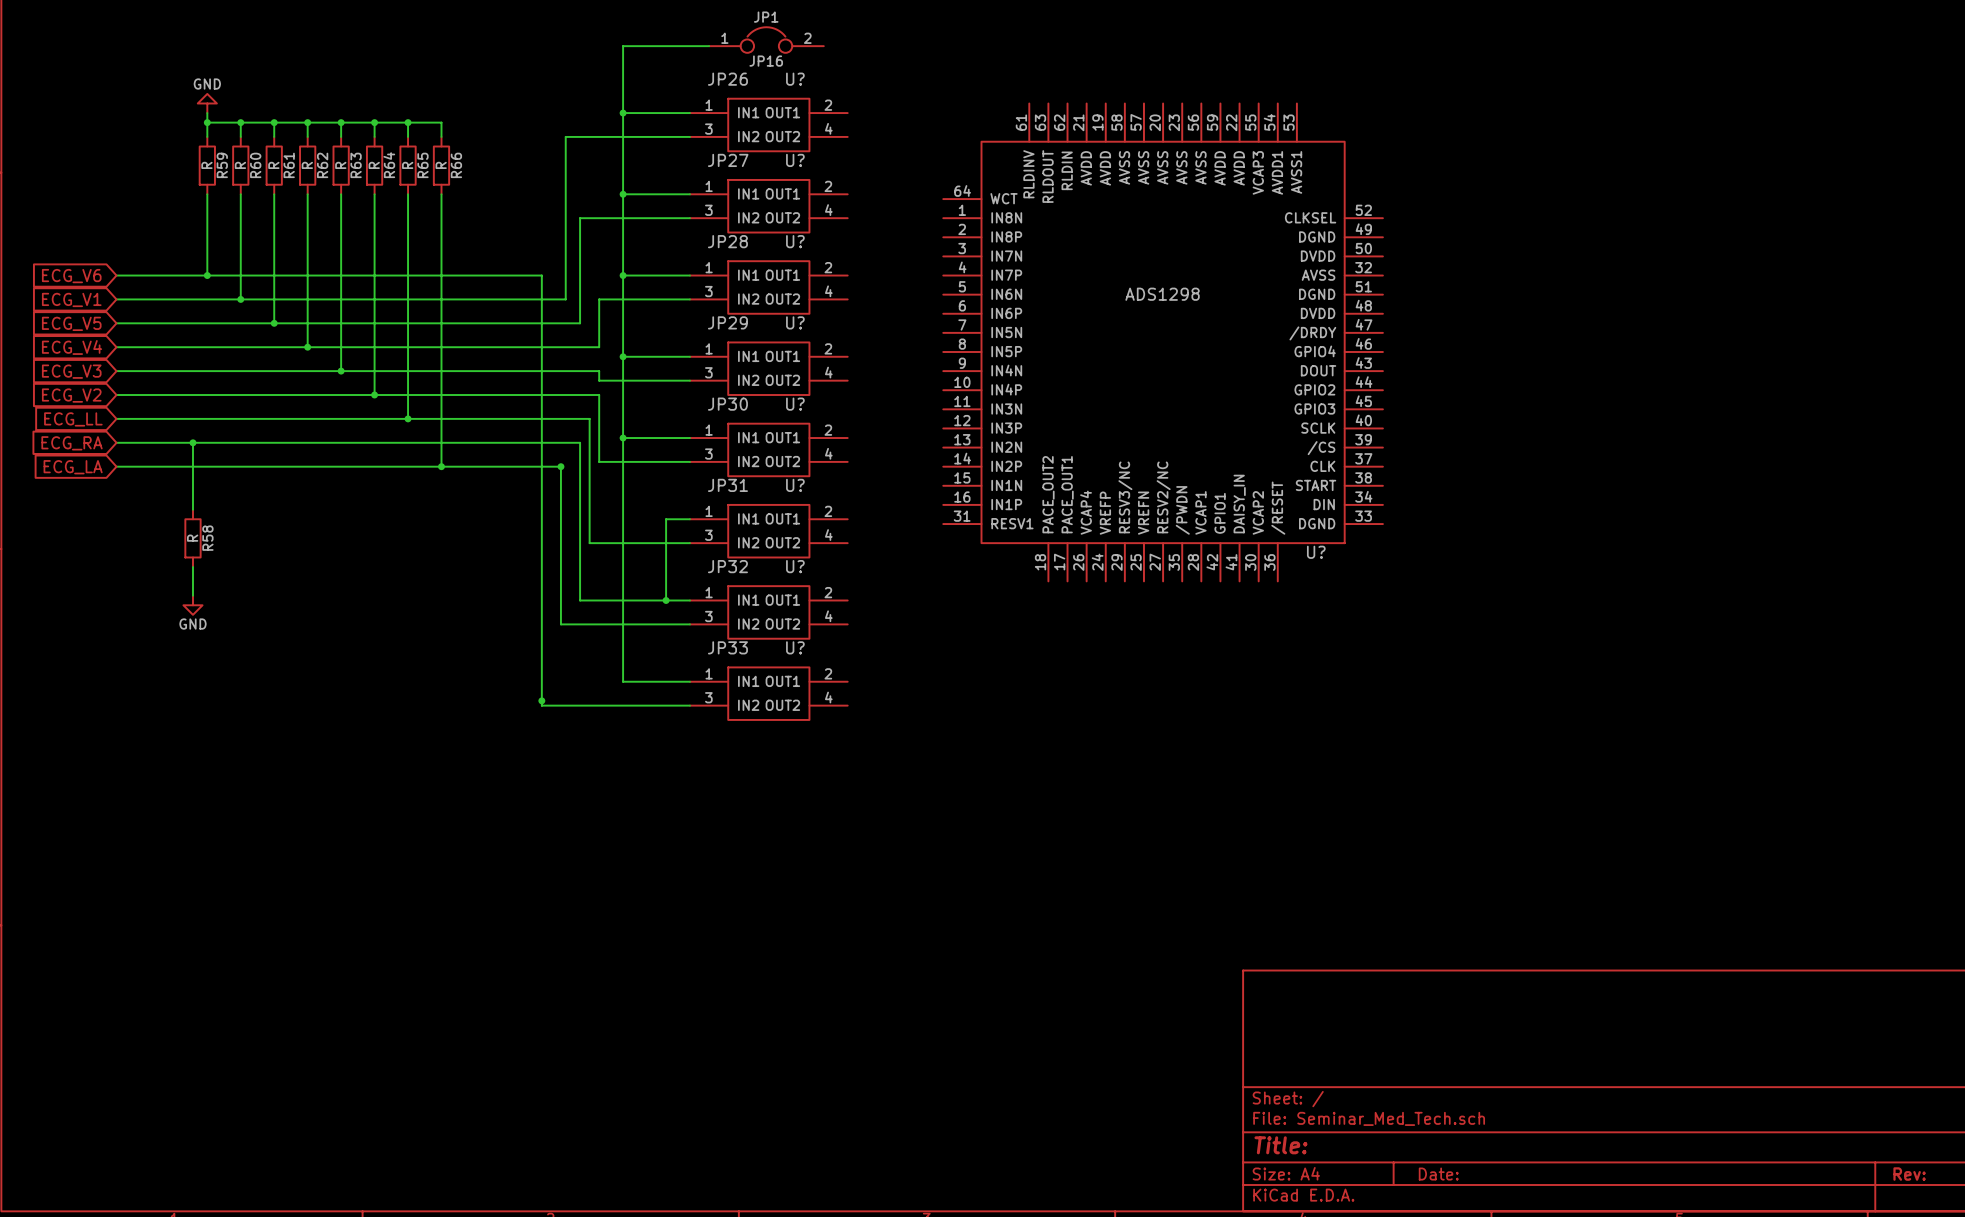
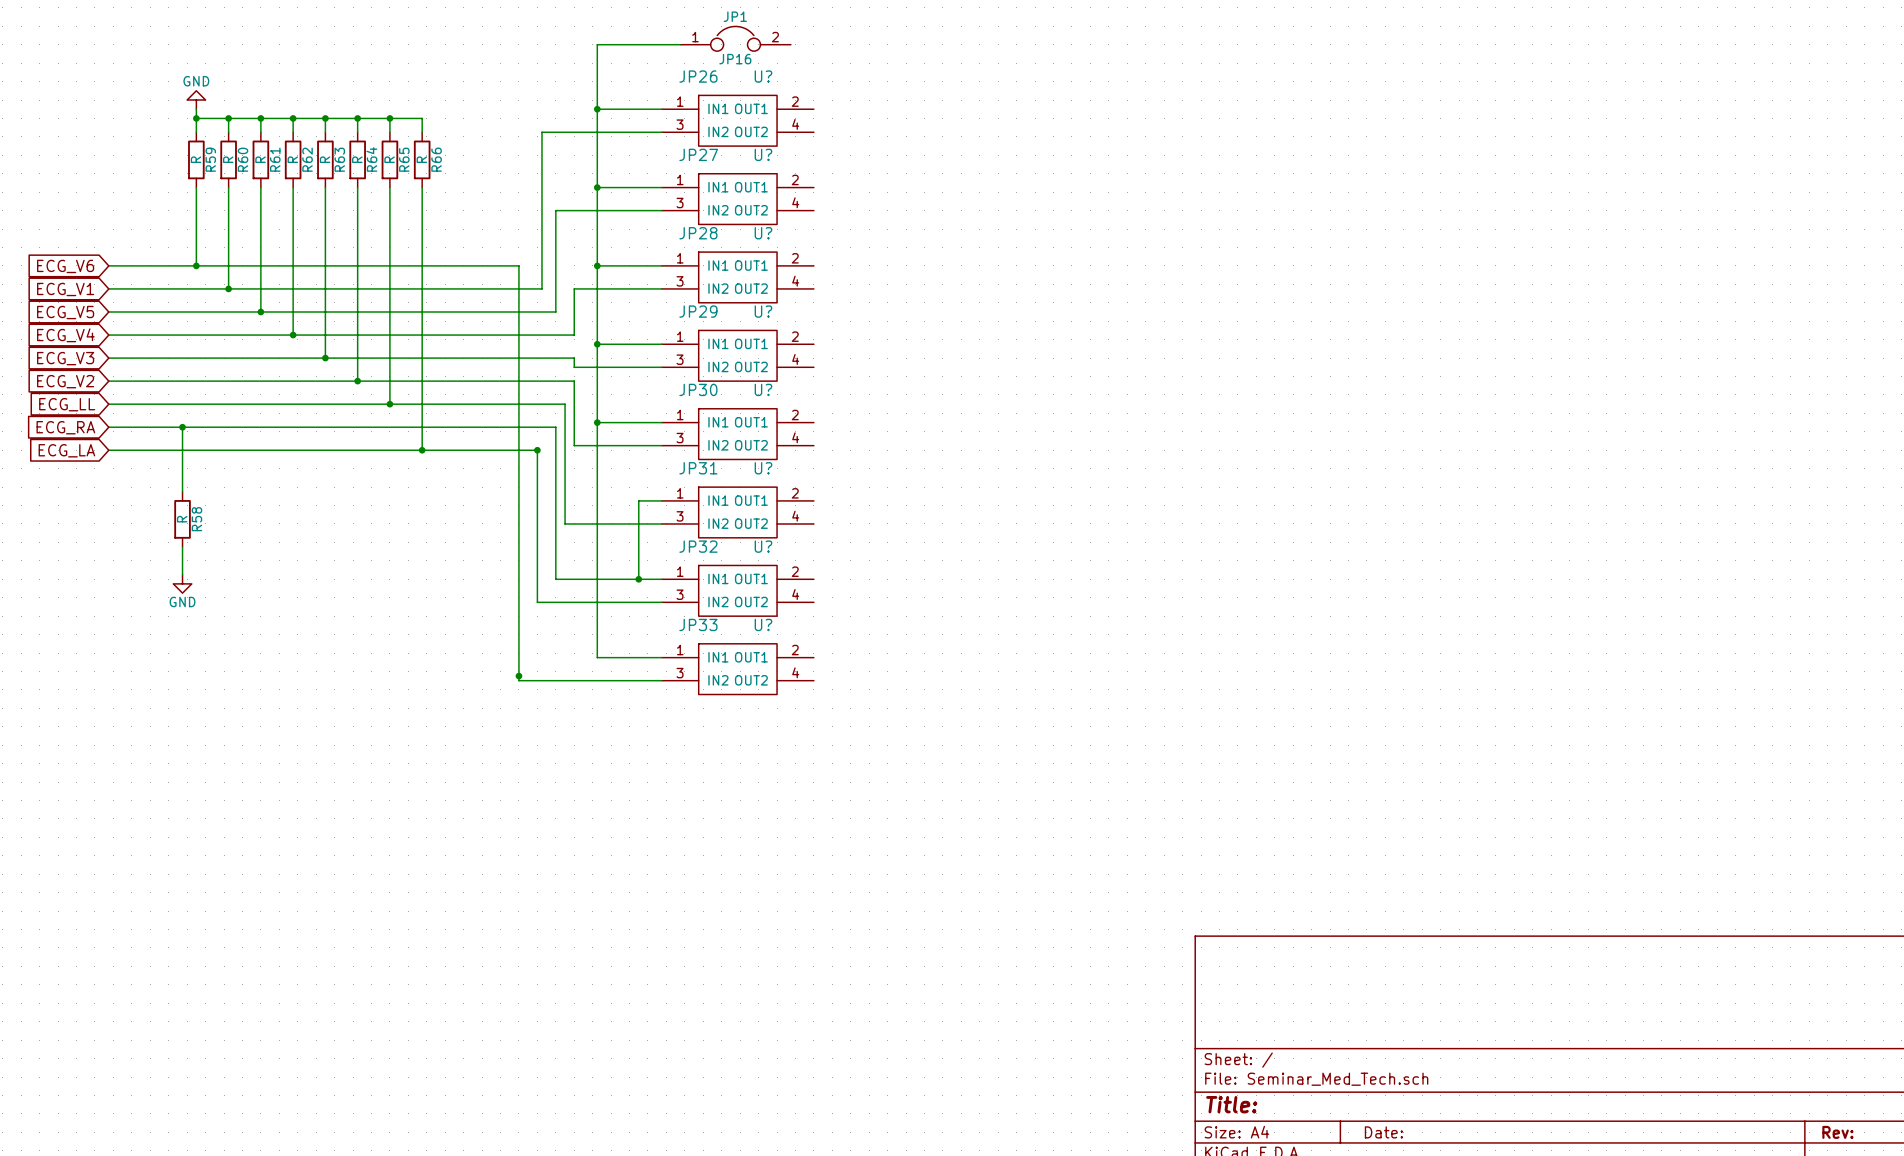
U?: ADS1298 (1163, 342) -> none

